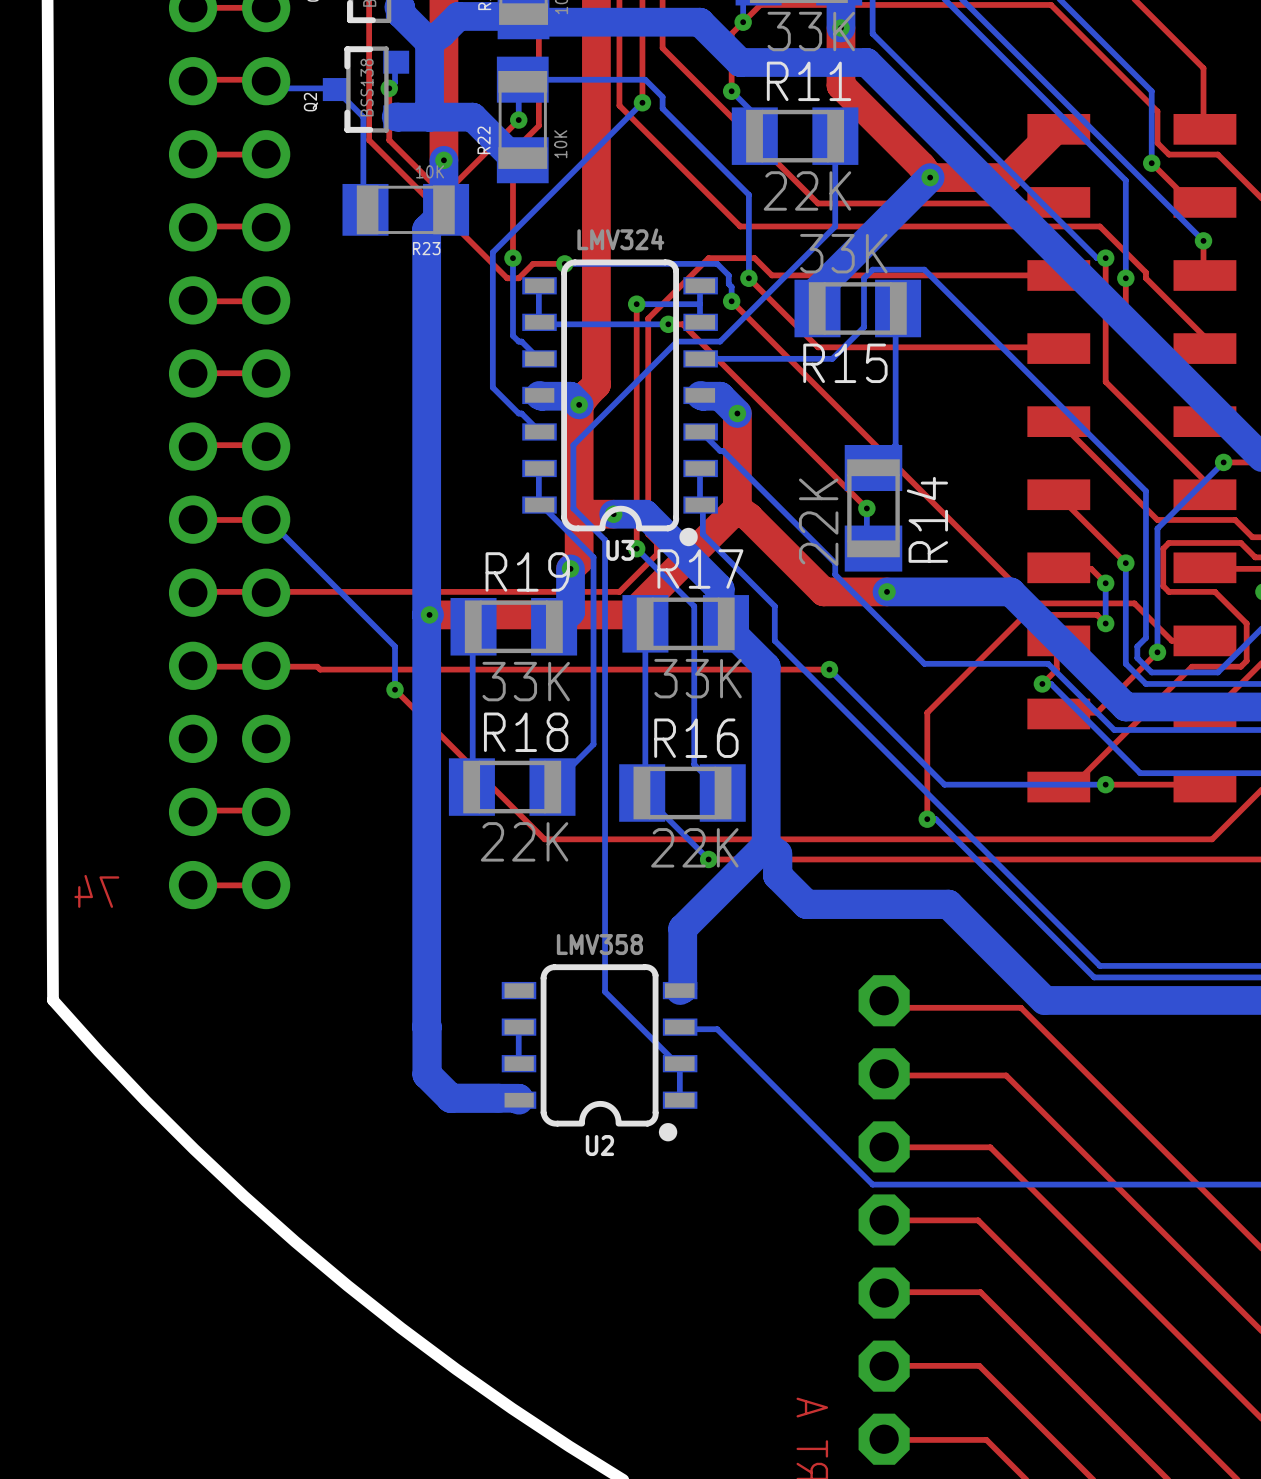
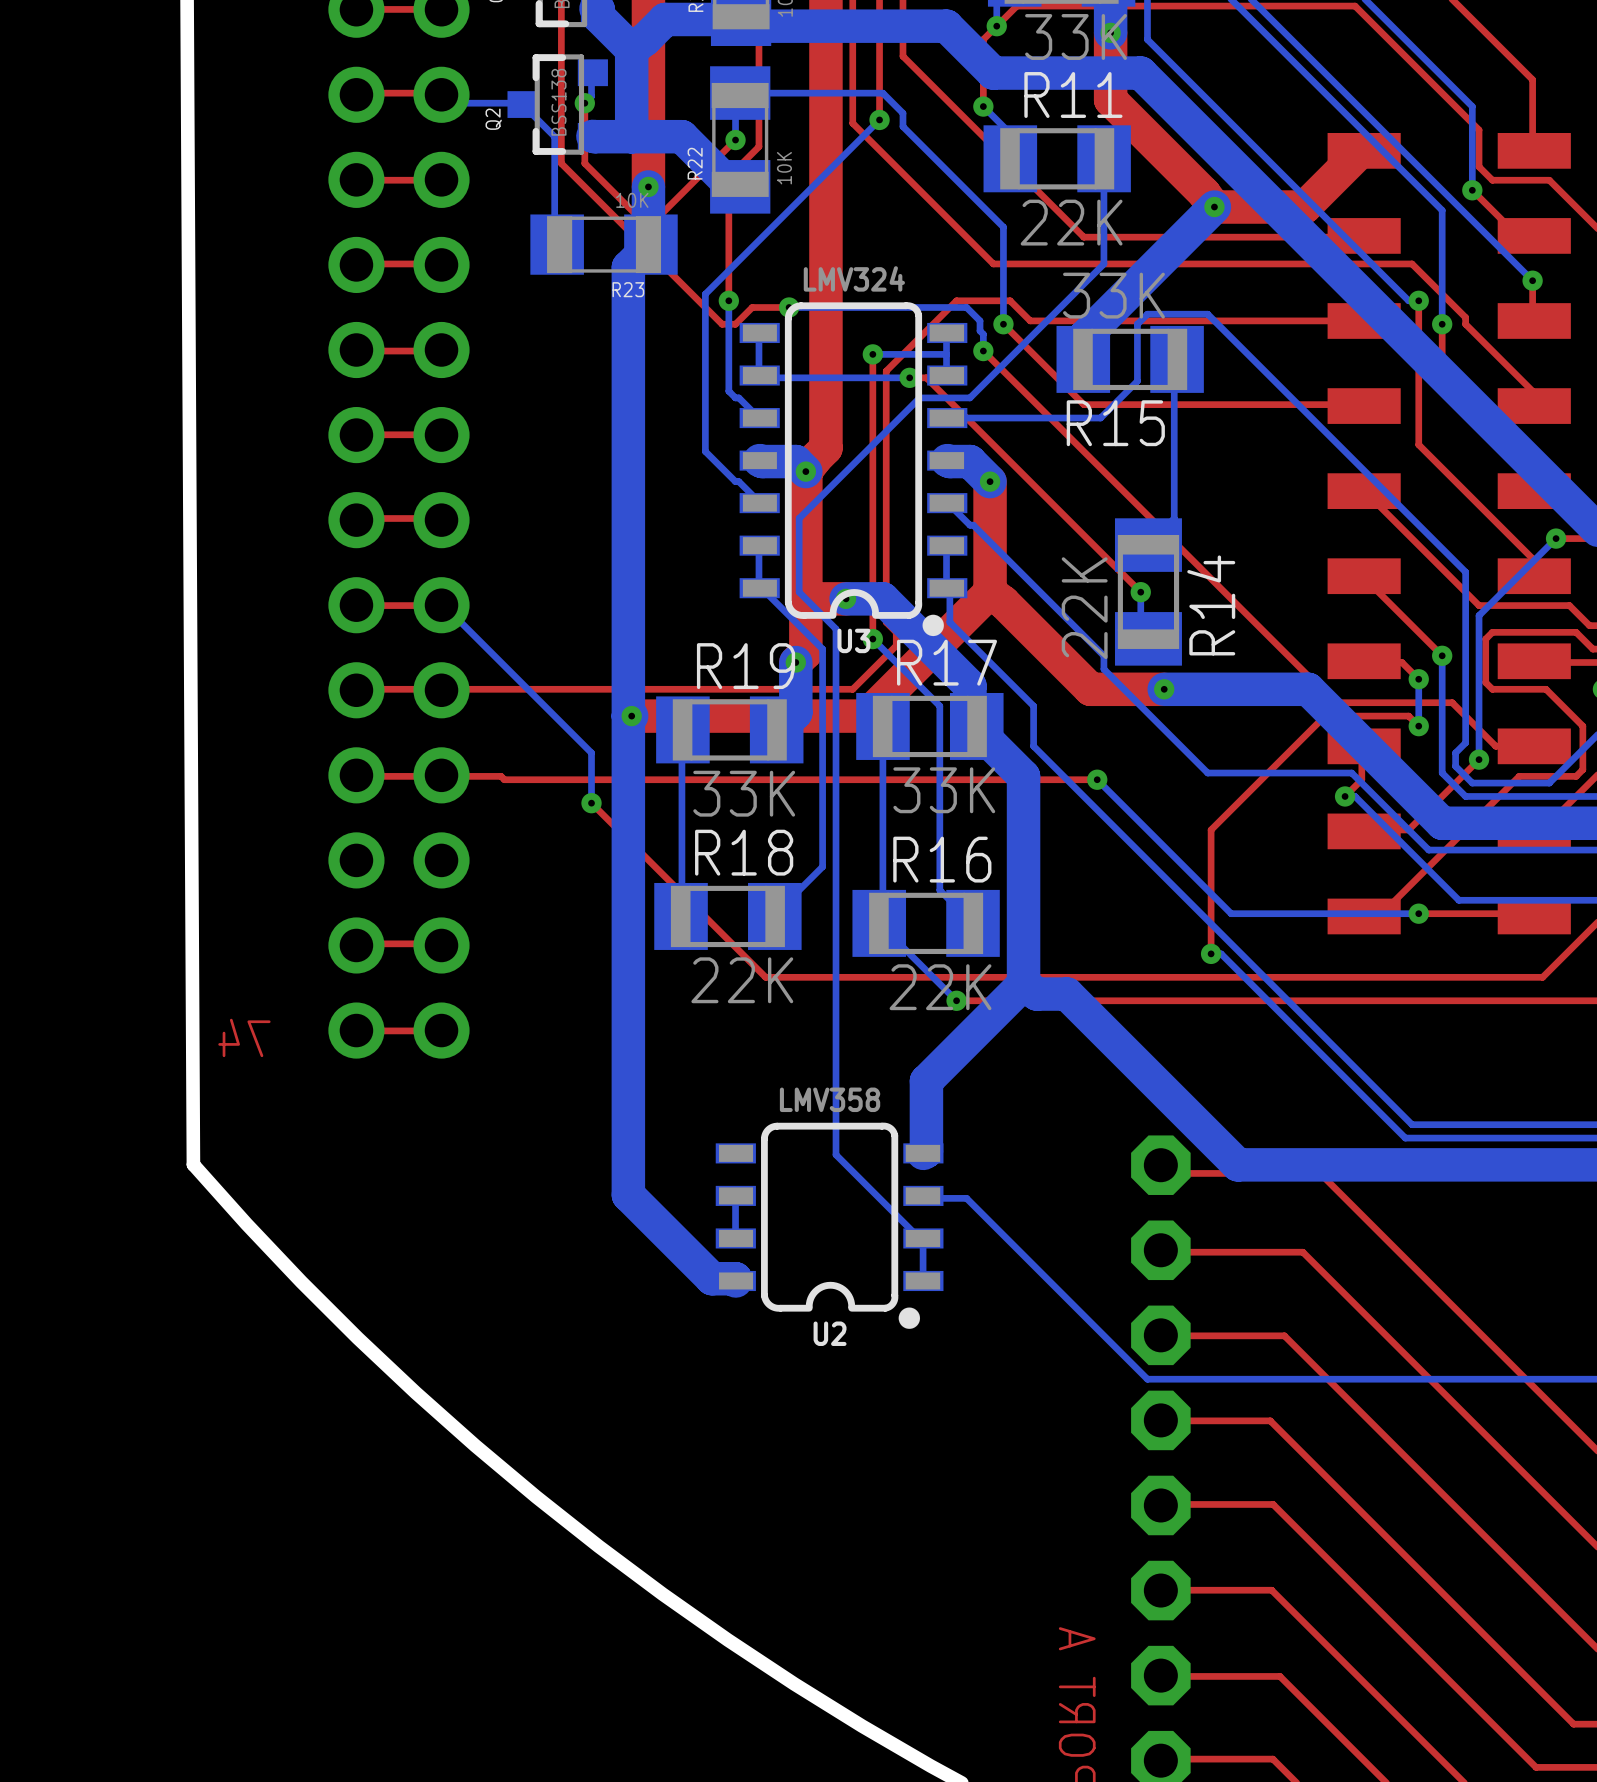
bottom track: (777, 853) (777, 875) (806, 904) (948, 904) (1044, 1000) -> (1036, 994) (1067, 994) (1237, 1164) (1347, 1164)
bottom track: (427, 1026) (427, 1074) (450, 1098) (498, 1098) -> (628, 1195) (712, 1278)

